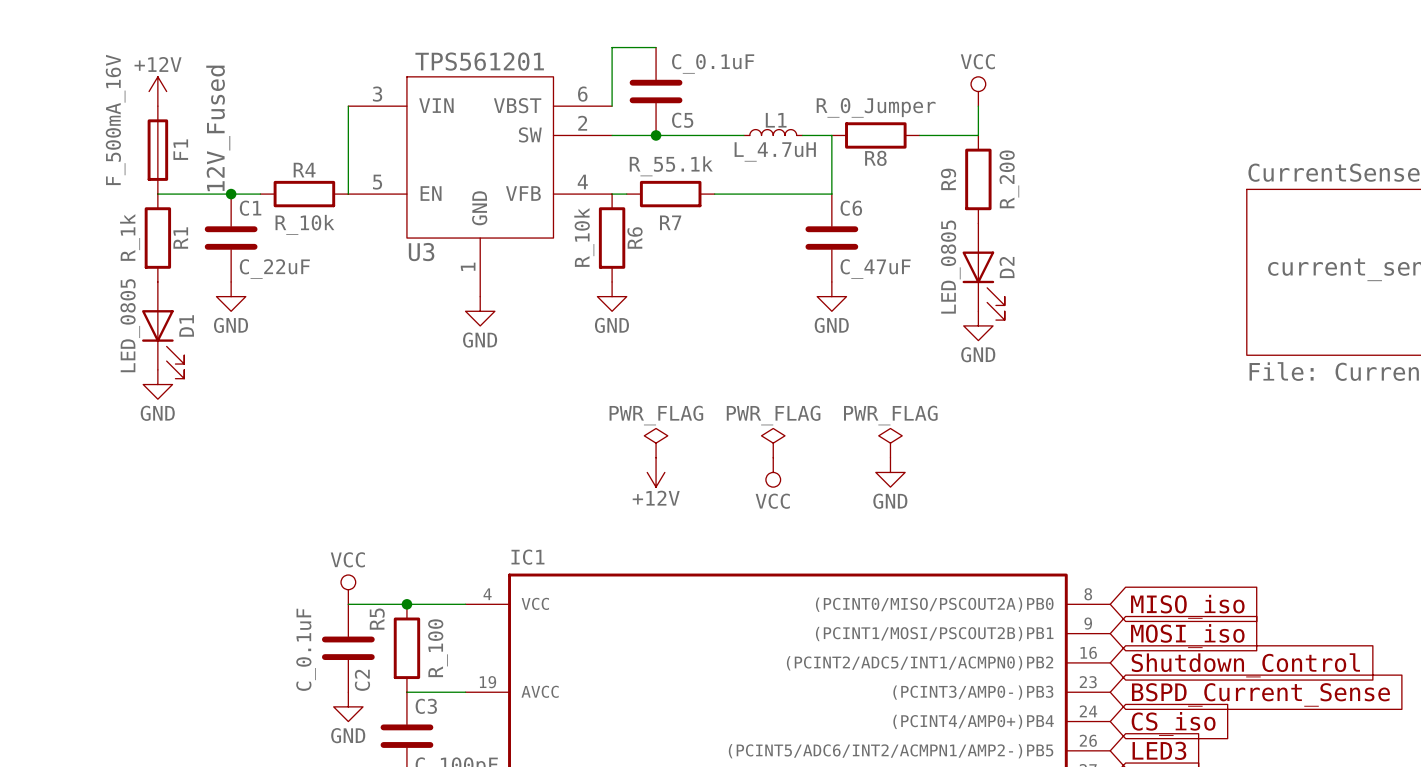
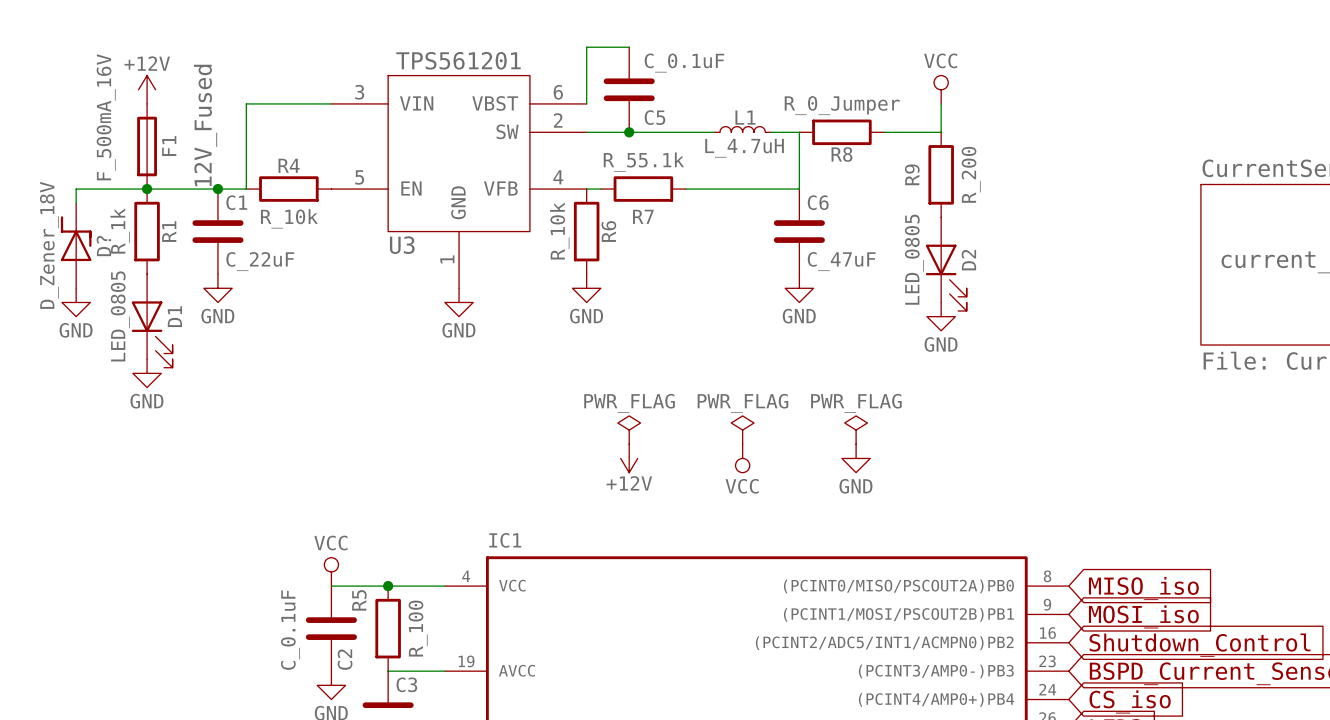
wire: (348, 106) (348, 194) -> (331, 103) (246, 103) (246, 189)
wire: none -> (147, 189) (76, 189) (76, 203)
junction: none -> (147, 189)
D?: none -> D_Zener_18V (76, 245)
power symbol: none -> GND (76, 302)

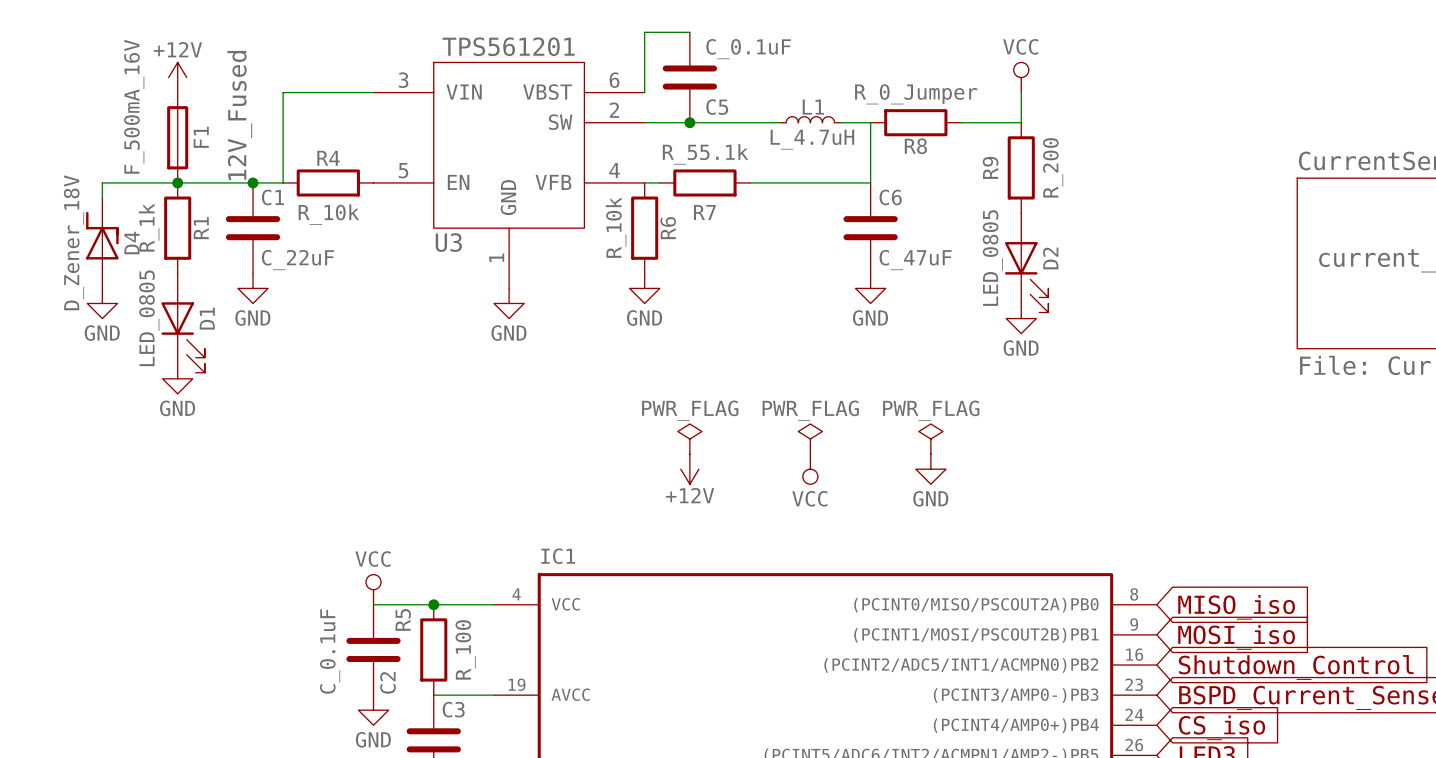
D? name: D? (103, 246) -> D4 (131, 243)

